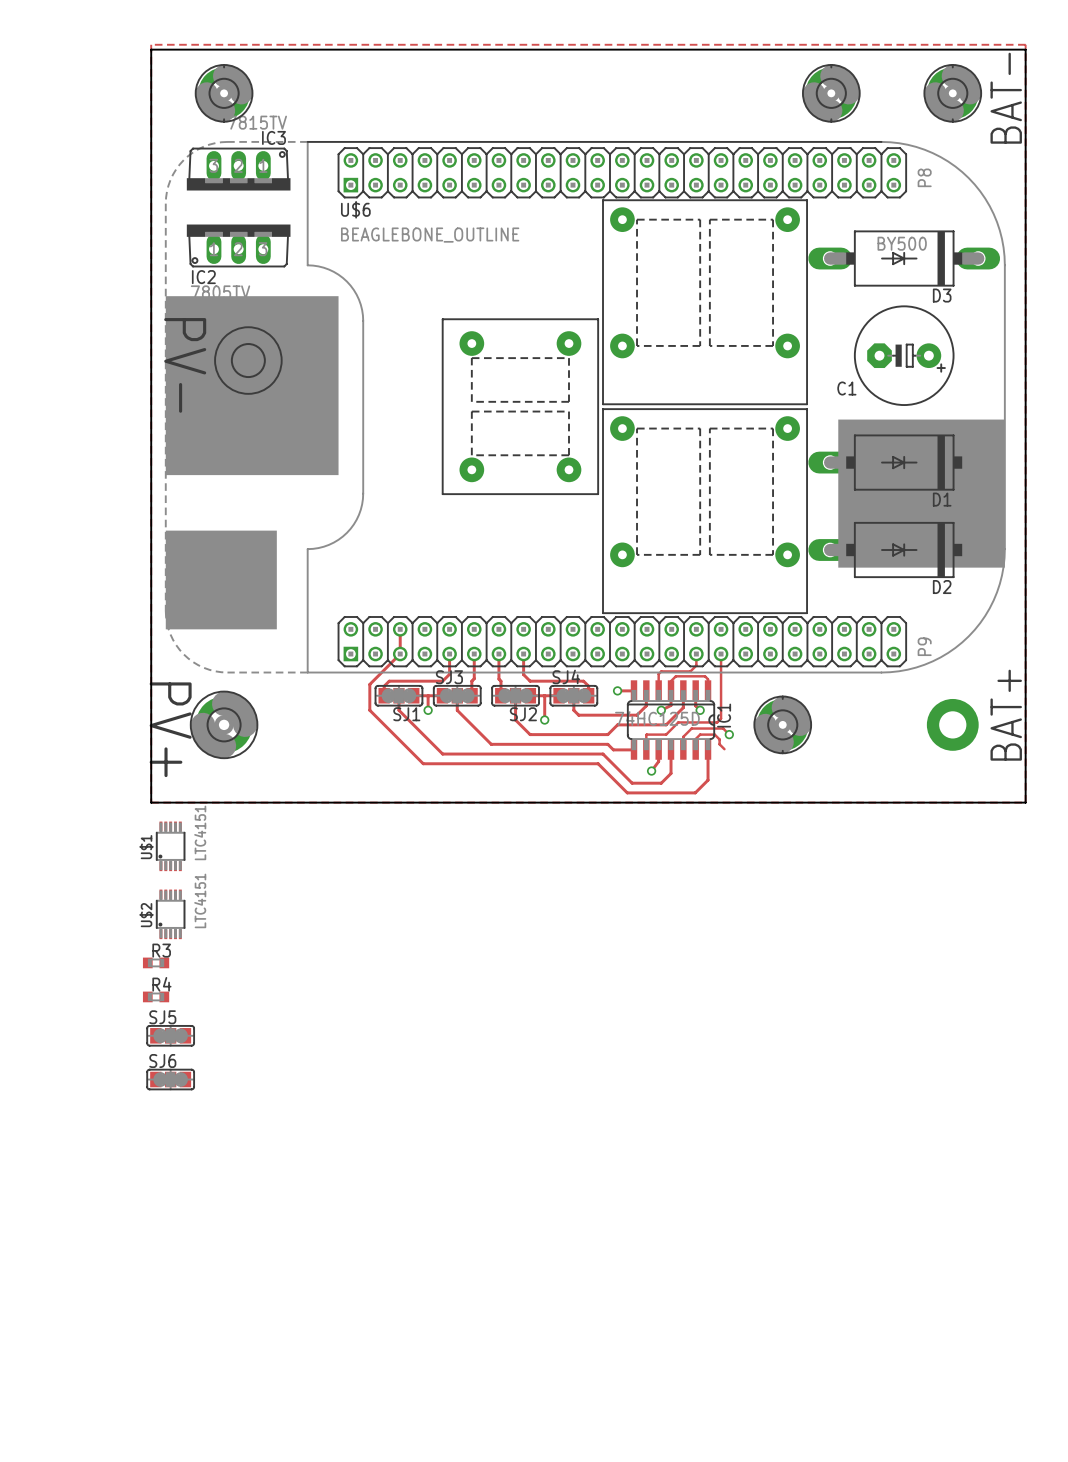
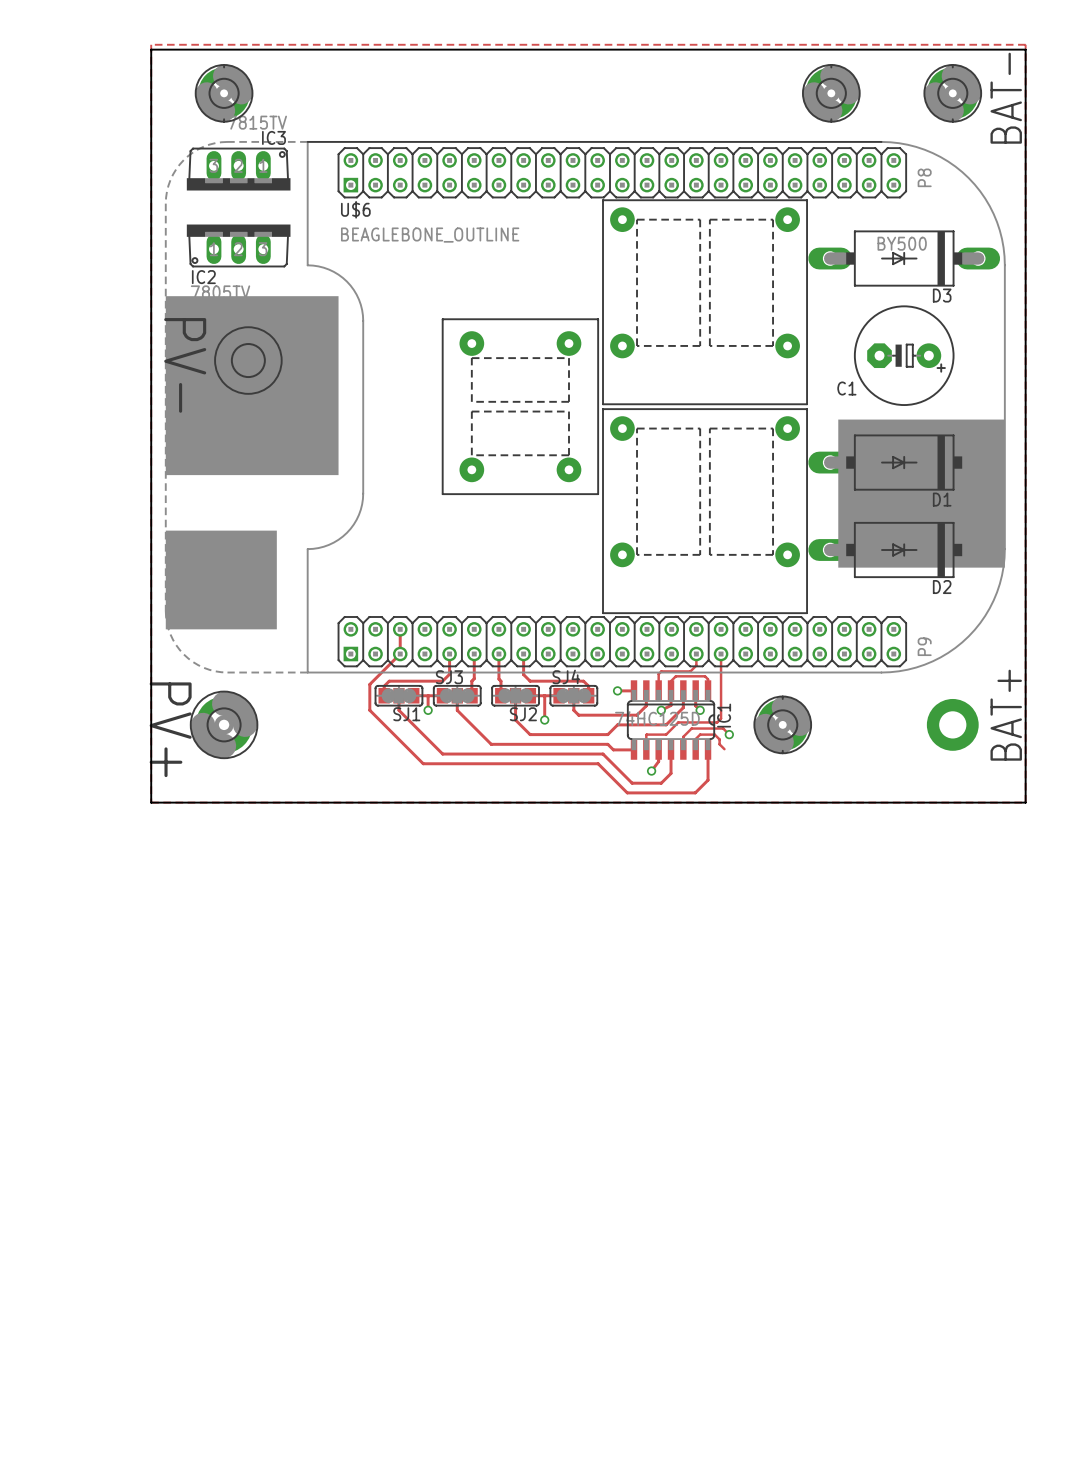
U$1: LTC4151 (170, 846) -> none
U$2: LTC4151 (170, 914) -> none
R3: (156, 962) -> none
R4: (156, 996) -> none
SJ5: (170, 1035) -> none
SJ6: (170, 1079) -> none

